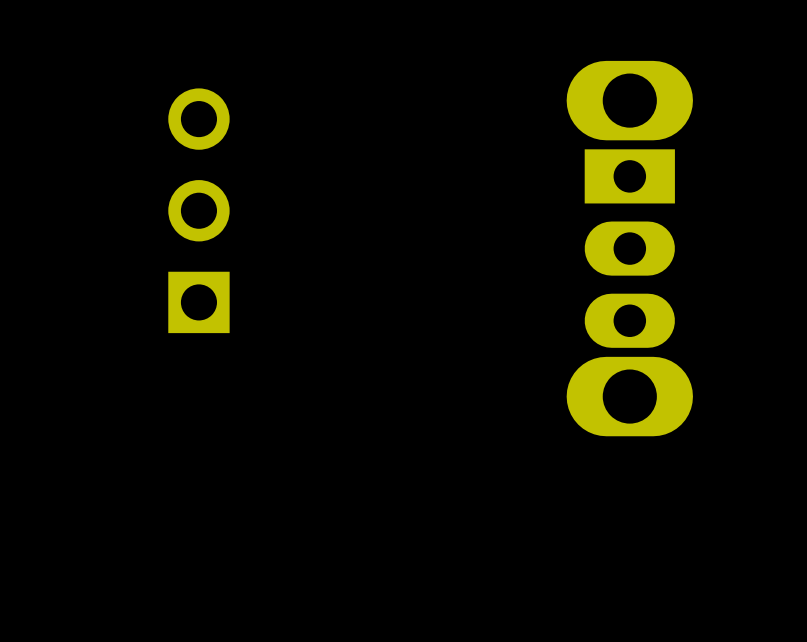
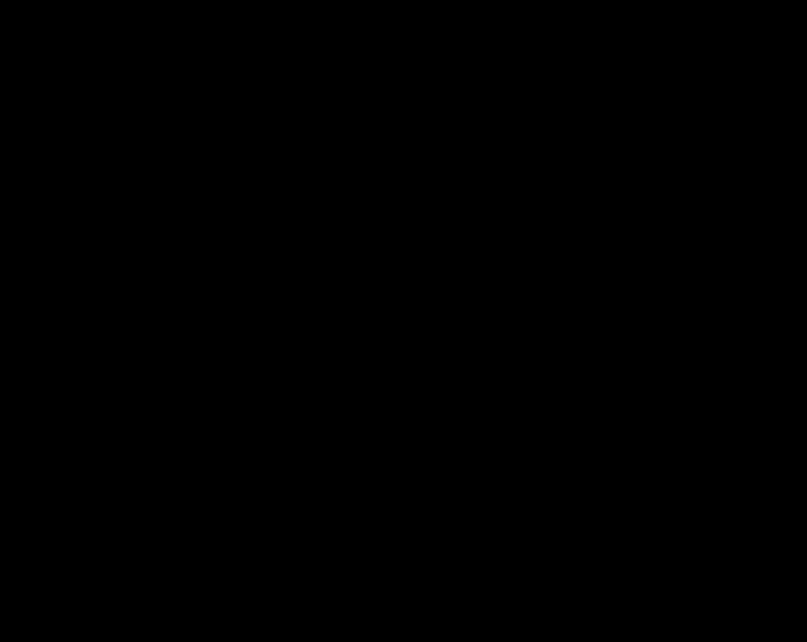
part: (198, 210) -> none
part: (629, 248) -> none

